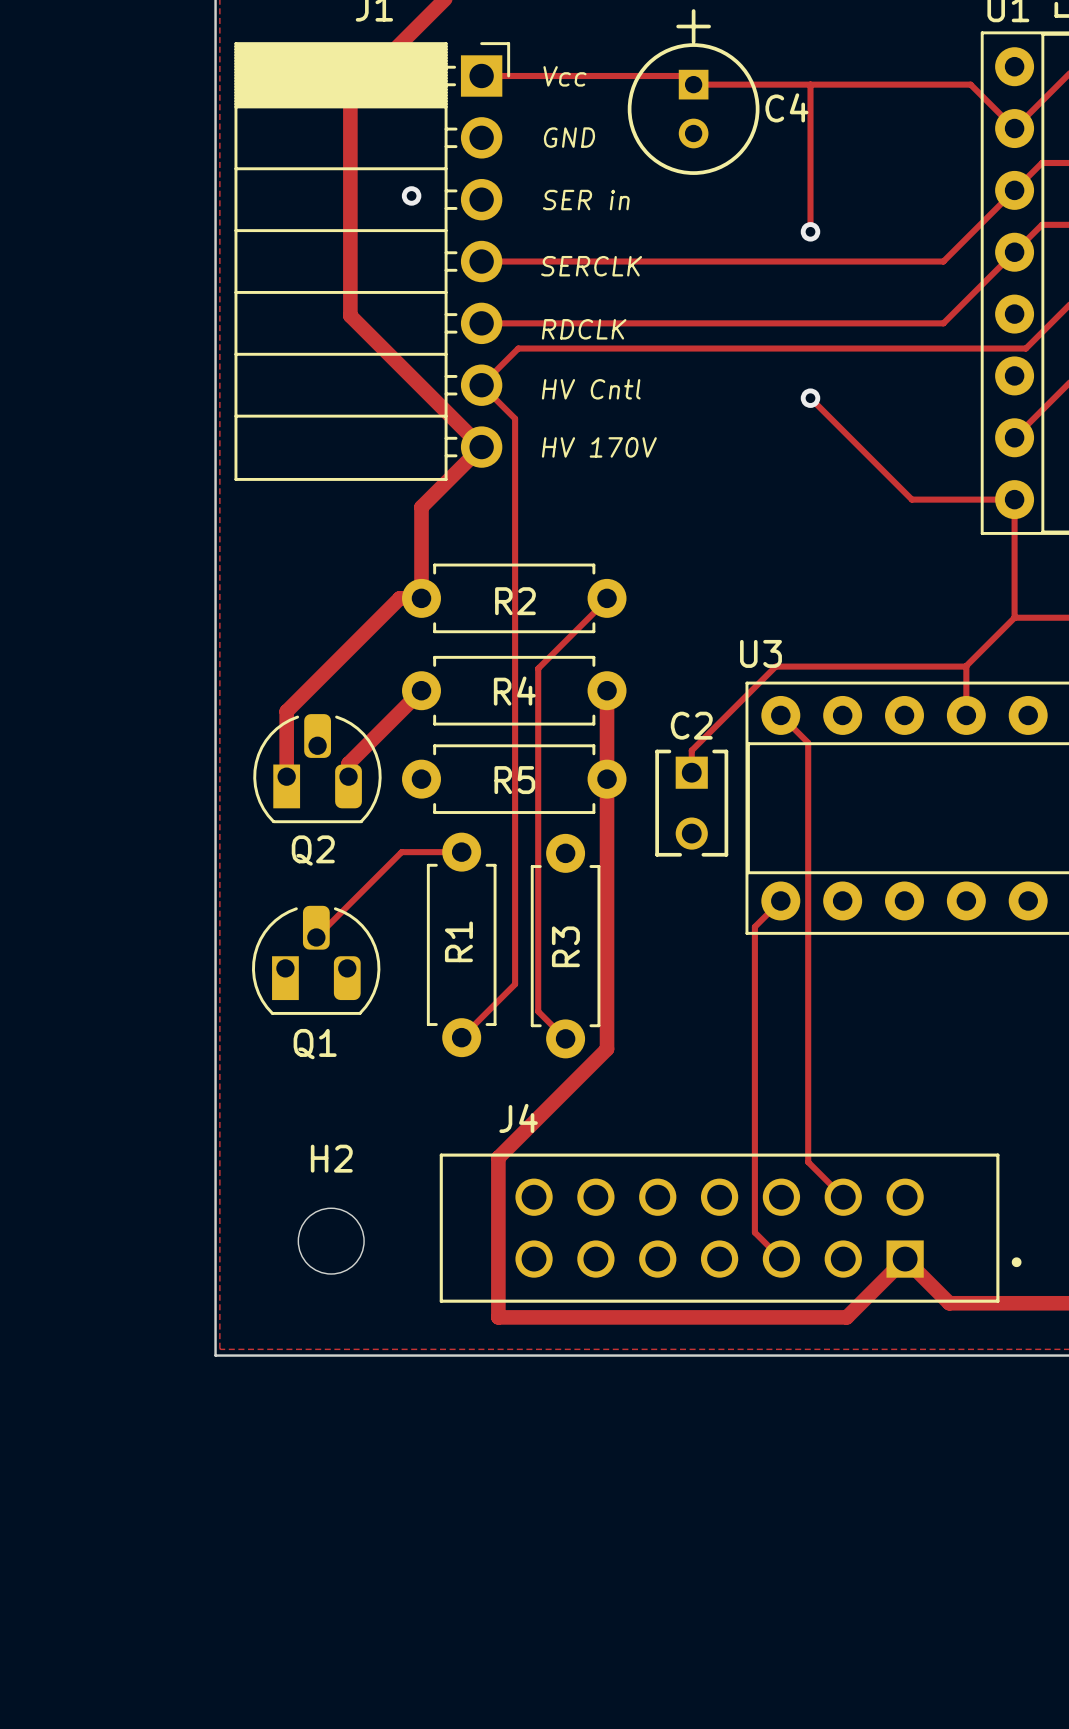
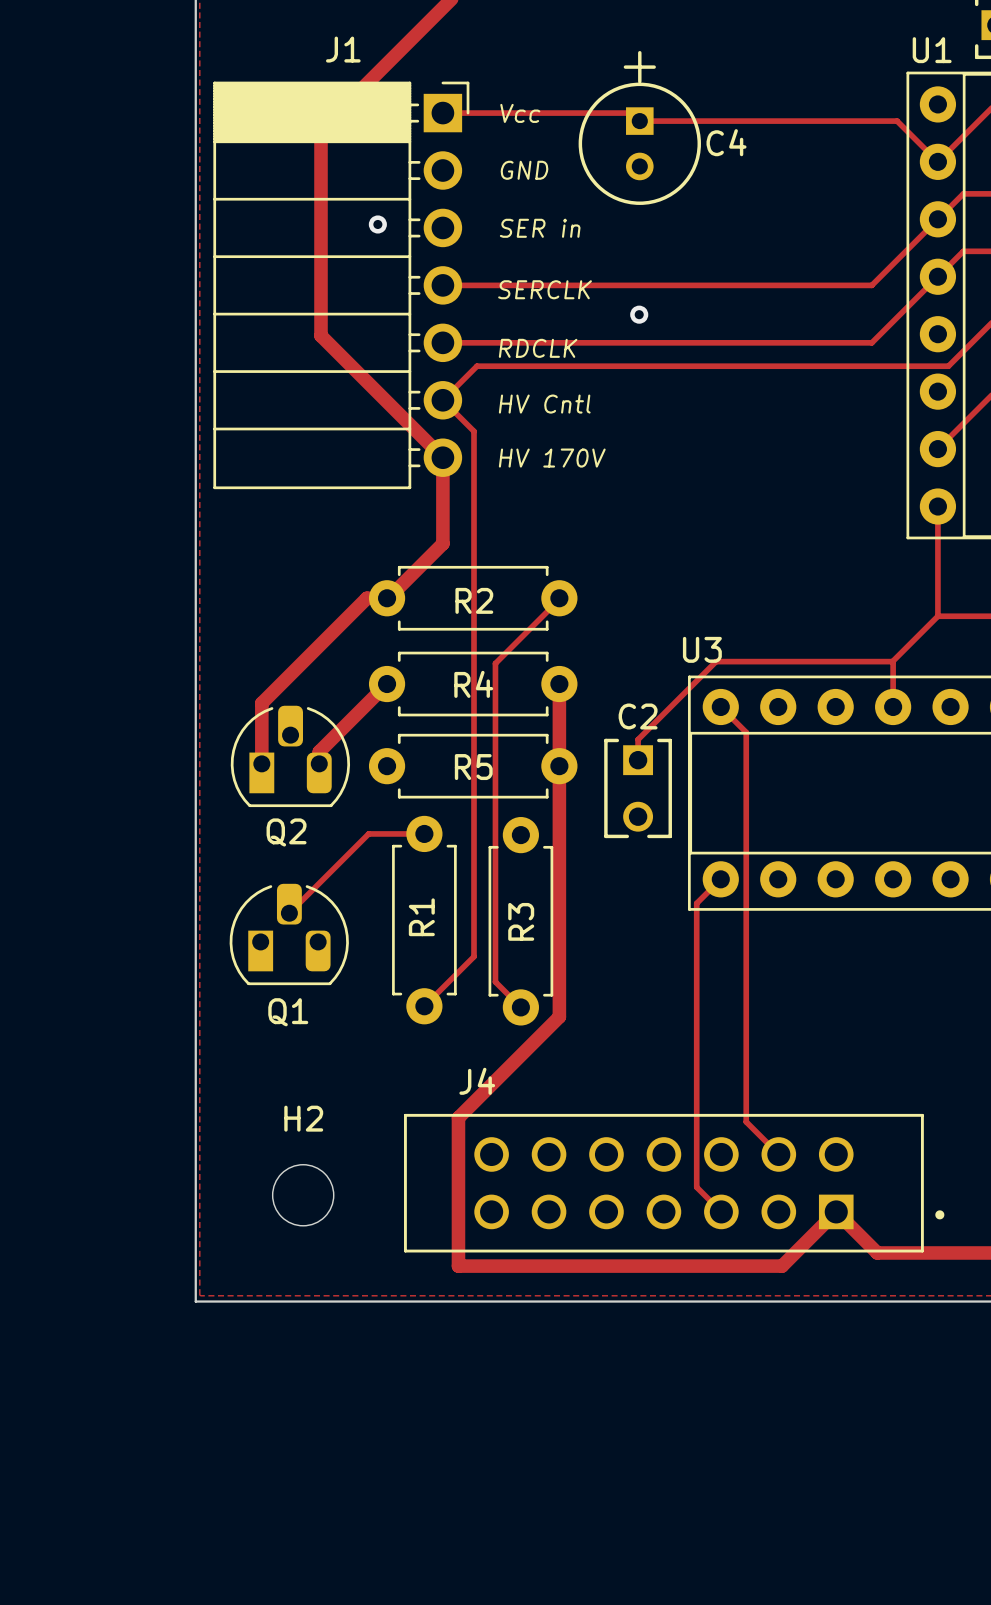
track: (810, 84) (810, 231) -> none
via: (810, 231) -> none
via: none -> (639, 314)
track: (810, 398) (911, 499) (1014, 499) -> none
via: (810, 398) -> none
track: (481, 447) (421, 507) (421, 598) -> (442, 457) (442, 543) (388, 598)

